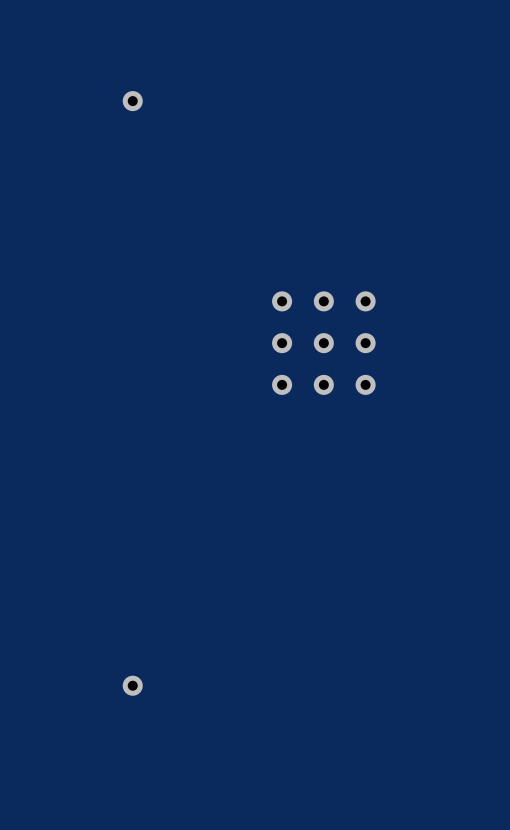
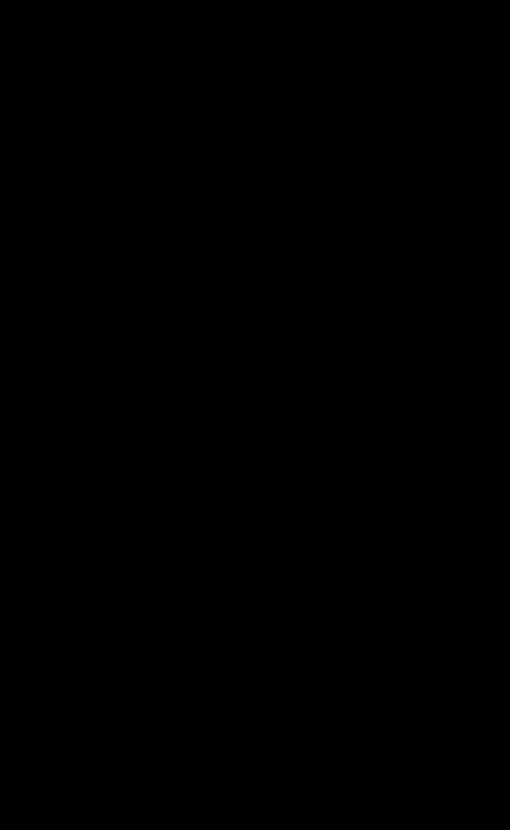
via: (132, 101) -> none
via: (282, 301) -> none
via: (323, 301) -> none
via: (365, 301) -> none
via: (282, 343) -> none
via: (323, 343) -> none
via: (365, 343) -> none
via: (282, 384) -> none
via: (323, 384) -> none
via: (365, 384) -> none
via: (132, 685) -> none

